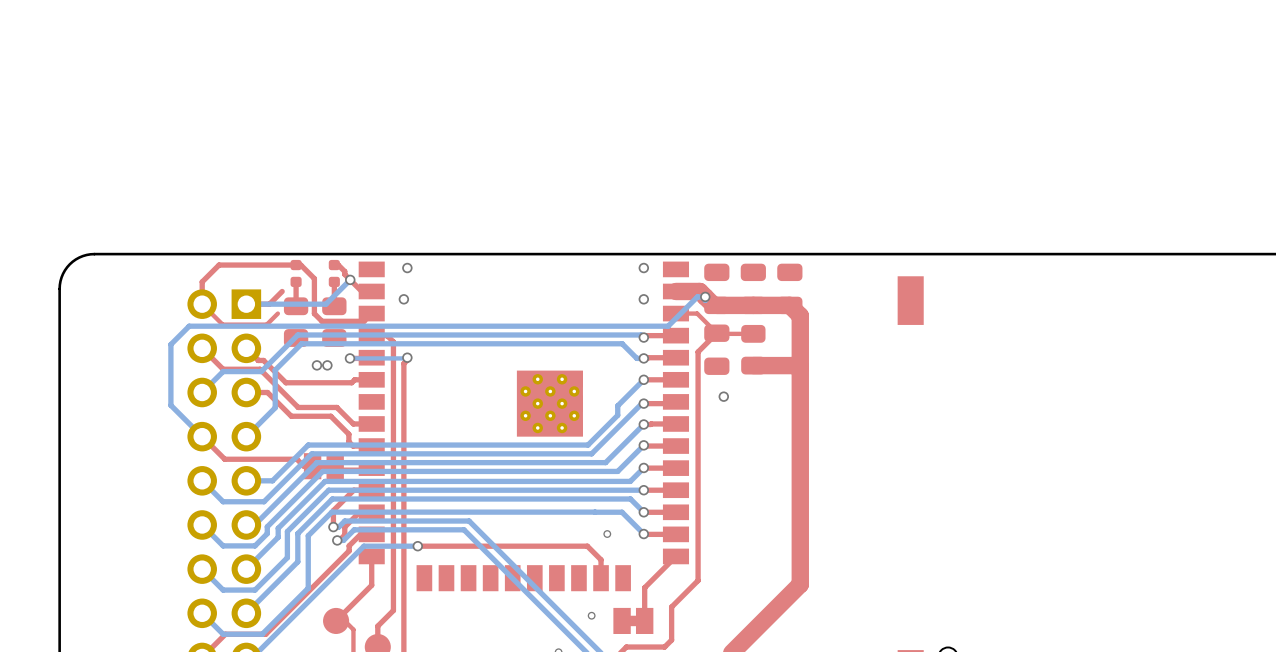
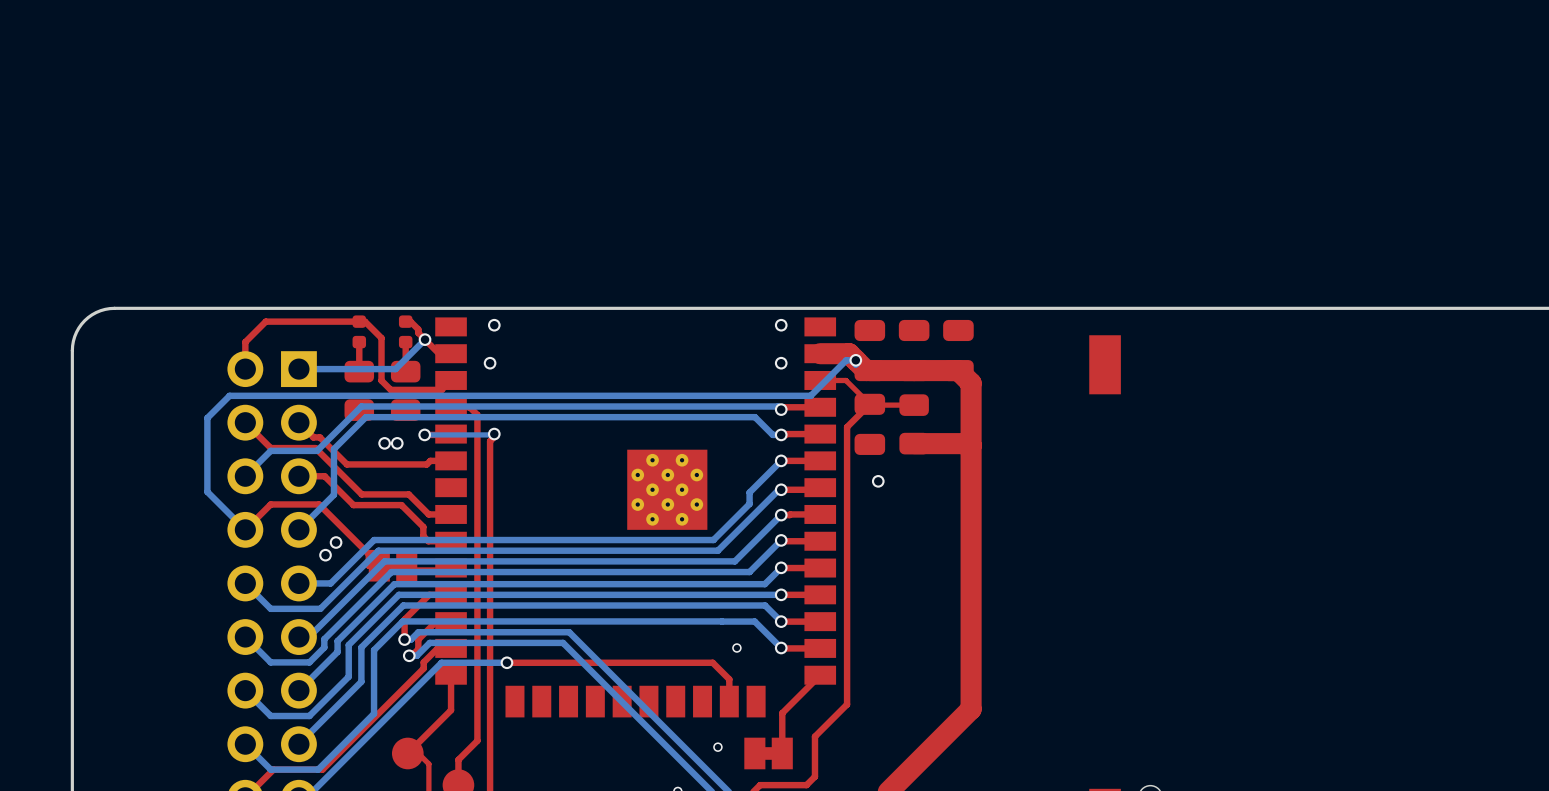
top track: (282, 291) (269, 304) (246, 304) -> none
top track: (202, 304) (222, 324) (266, 324) (277, 313) -> none
top track: (202, 436) (224, 459) (296, 459) (303, 466) -> (245, 529) (270, 504) (319, 504) (368, 554) (368, 565)
via: none -> (336, 542)
via: none -> (325, 555)

